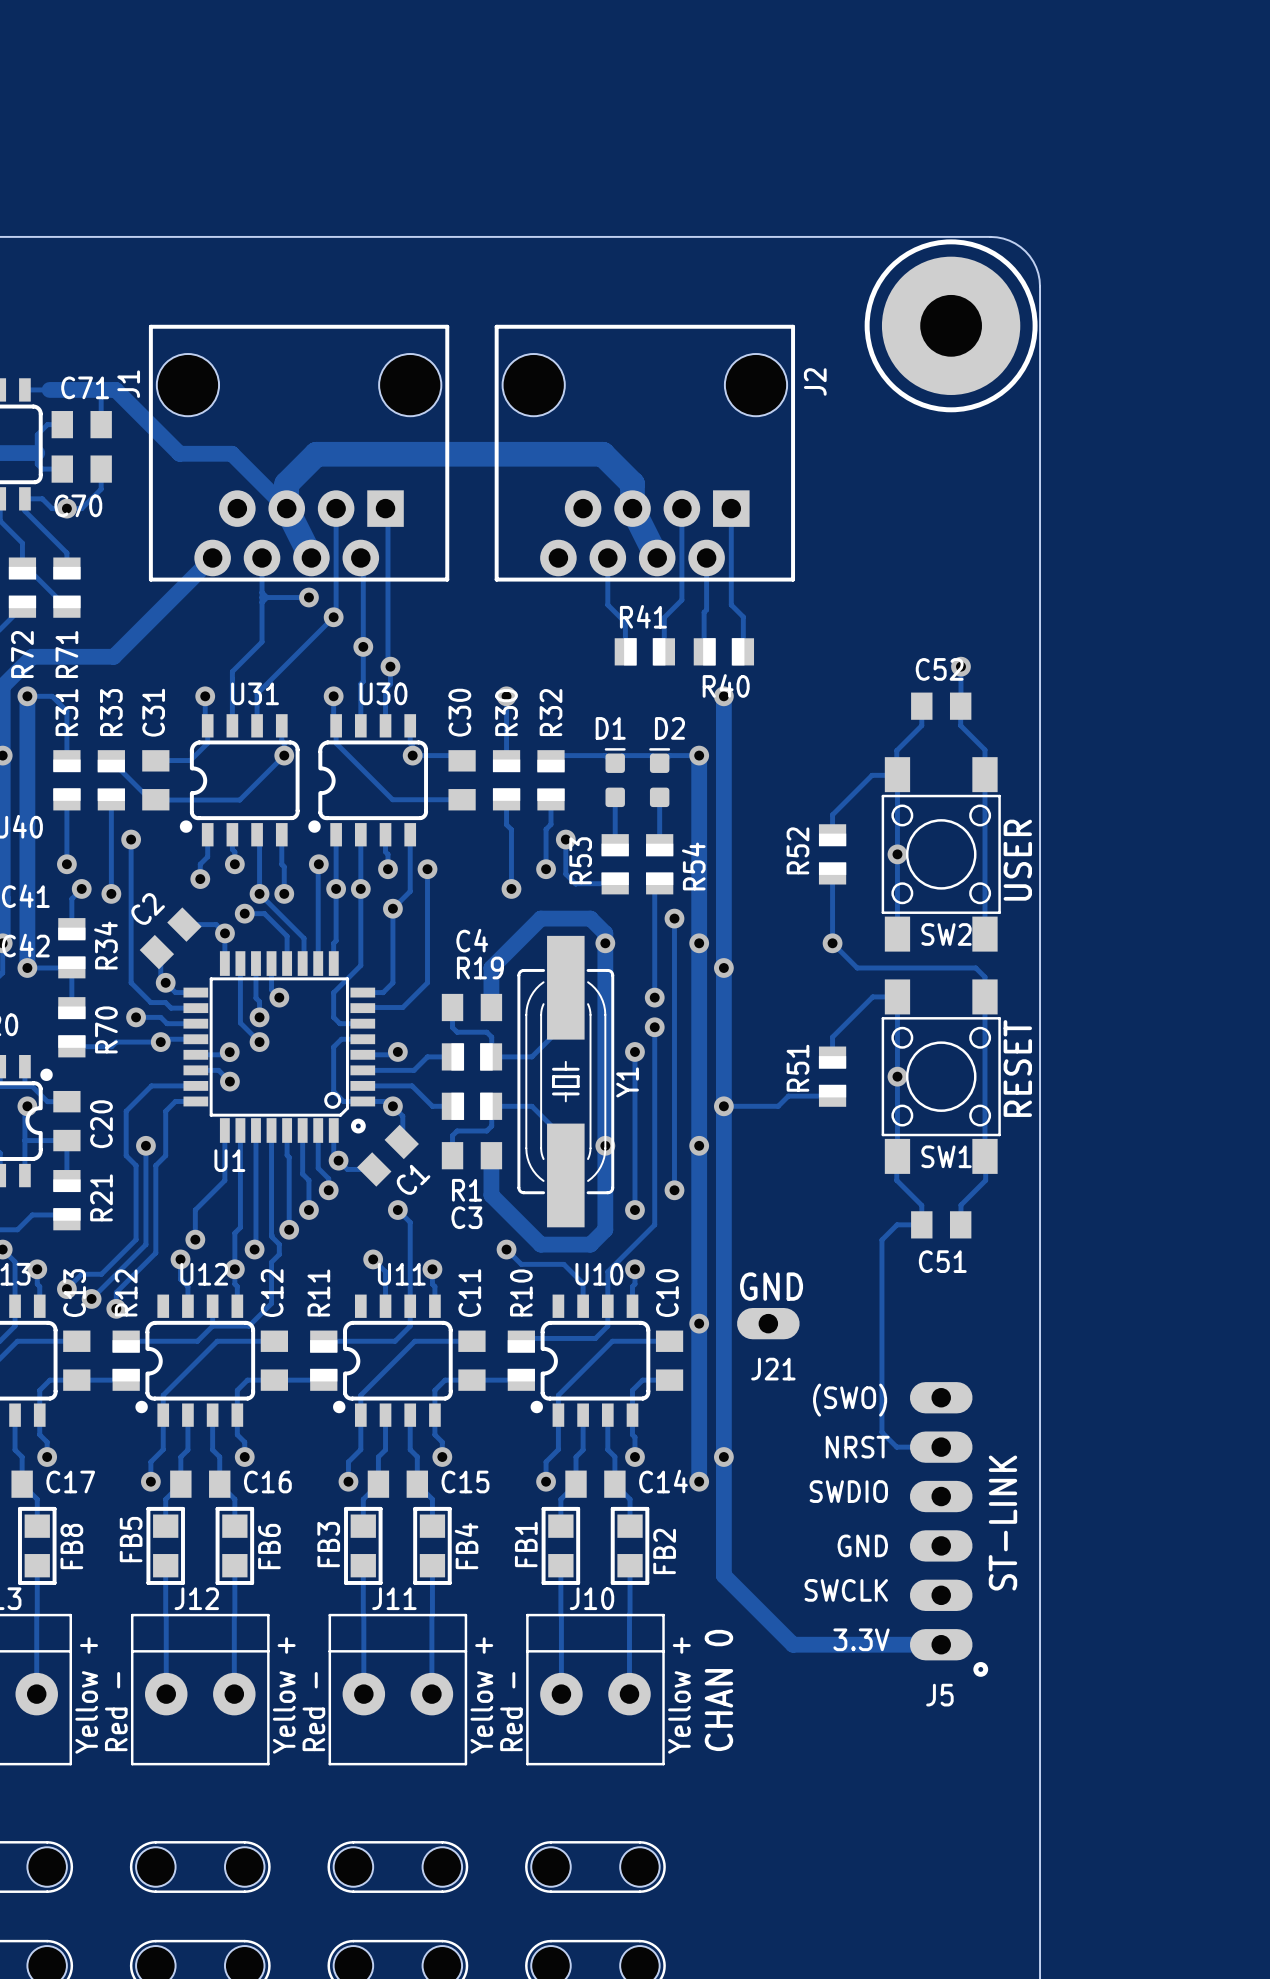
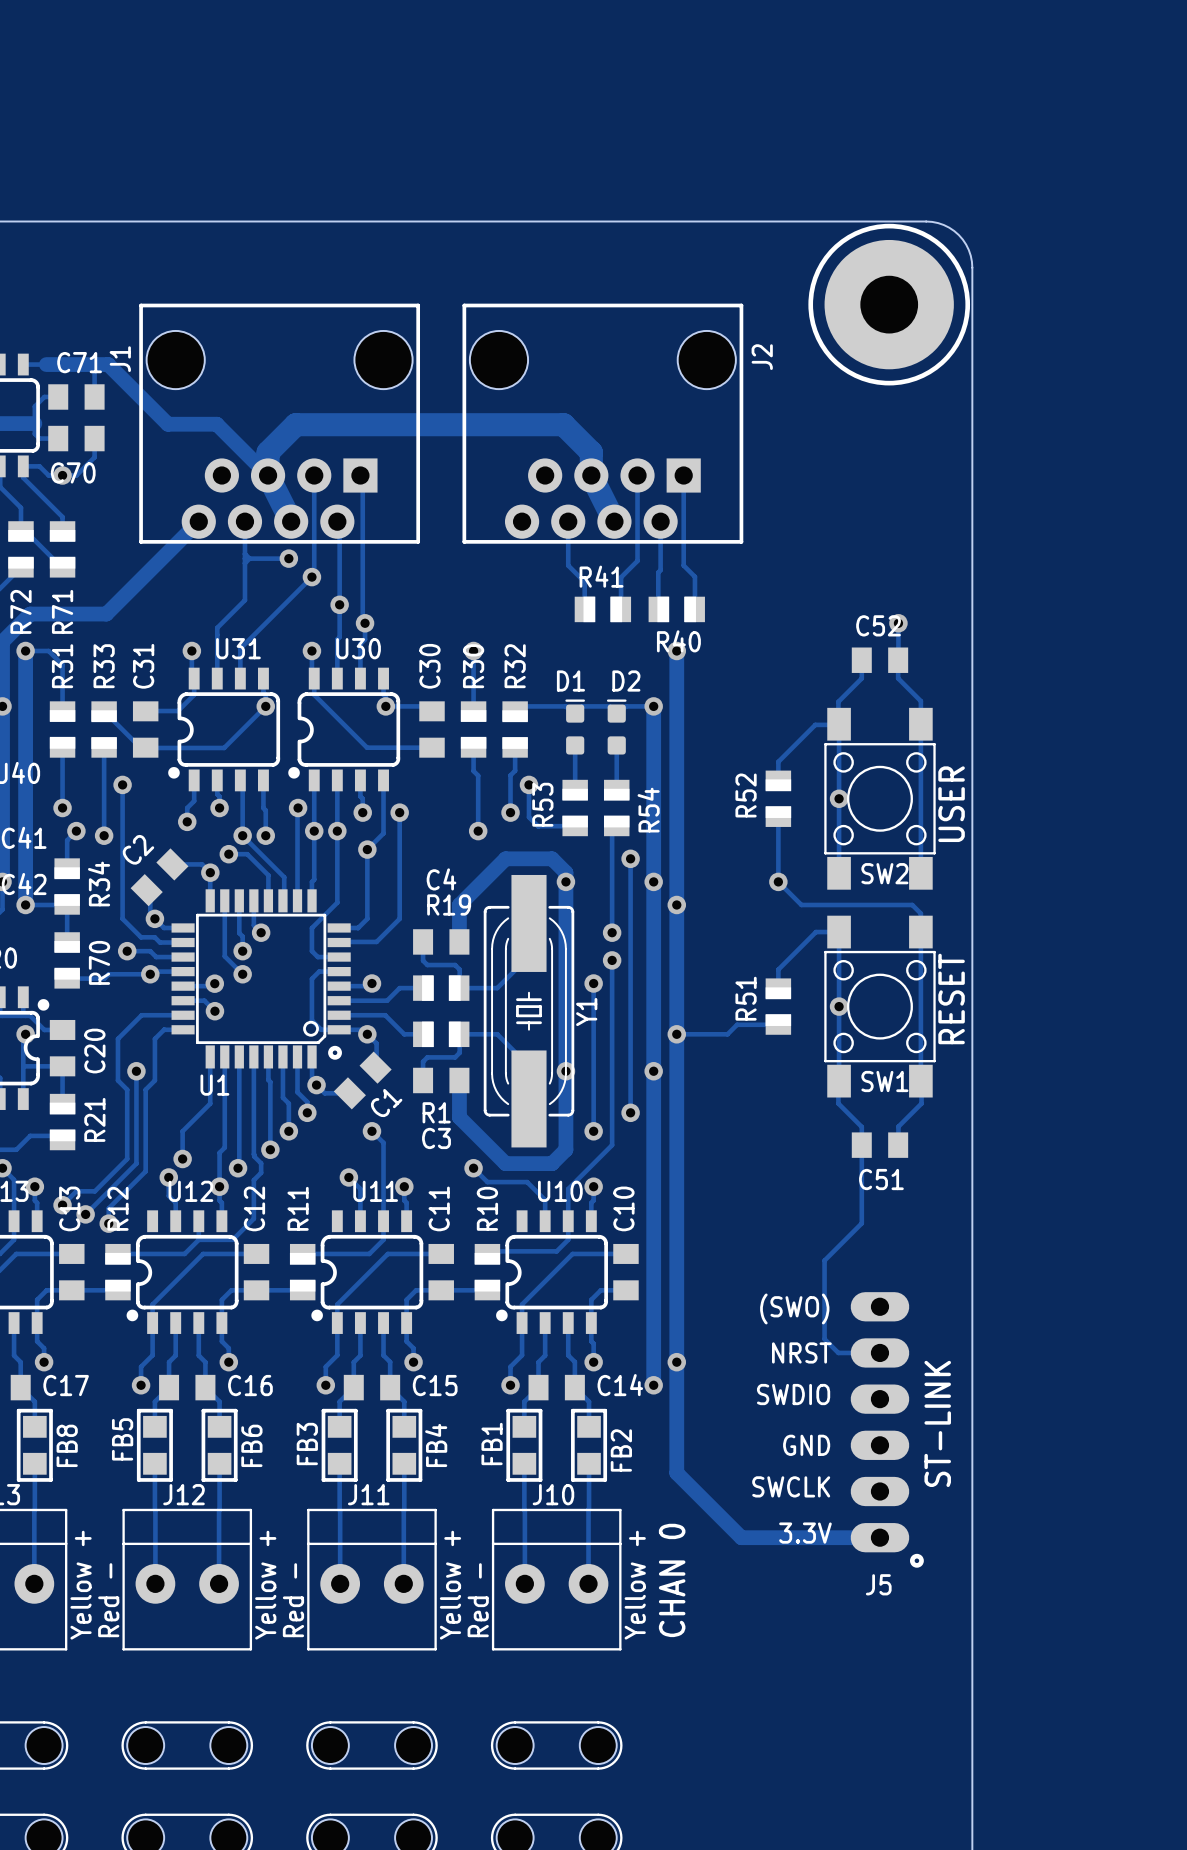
track: (921, 1224) (897, 1224) (881, 1239) (881, 1348) -> (861, 1145) (861, 1223) (824, 1260)
text: GND (771, 1286) -> none
via: (699, 1323) -> none
J21: (768, 1323) -> none

